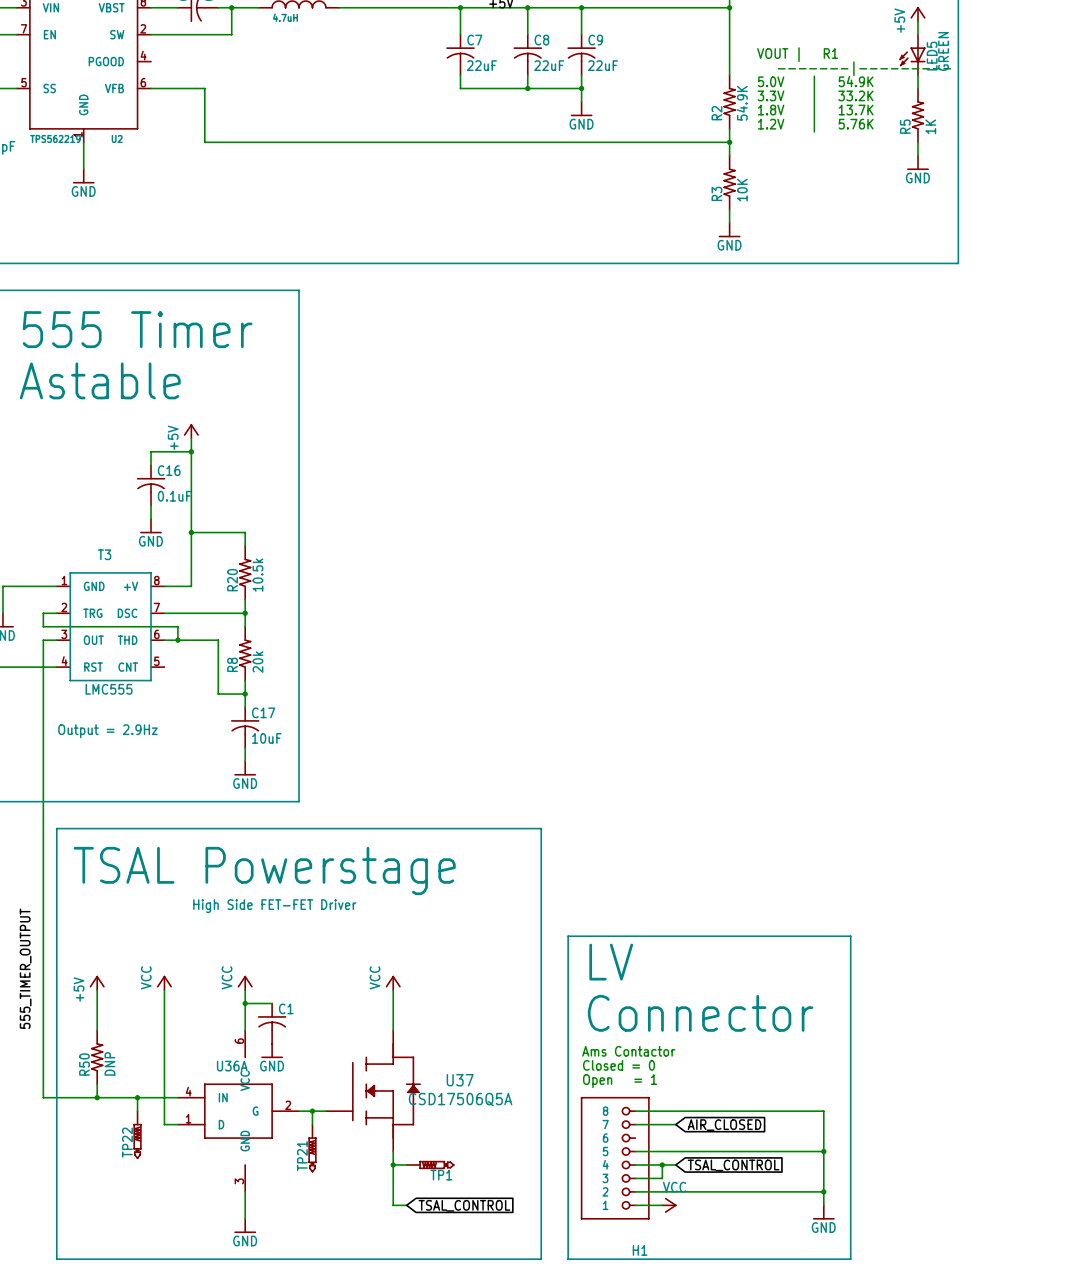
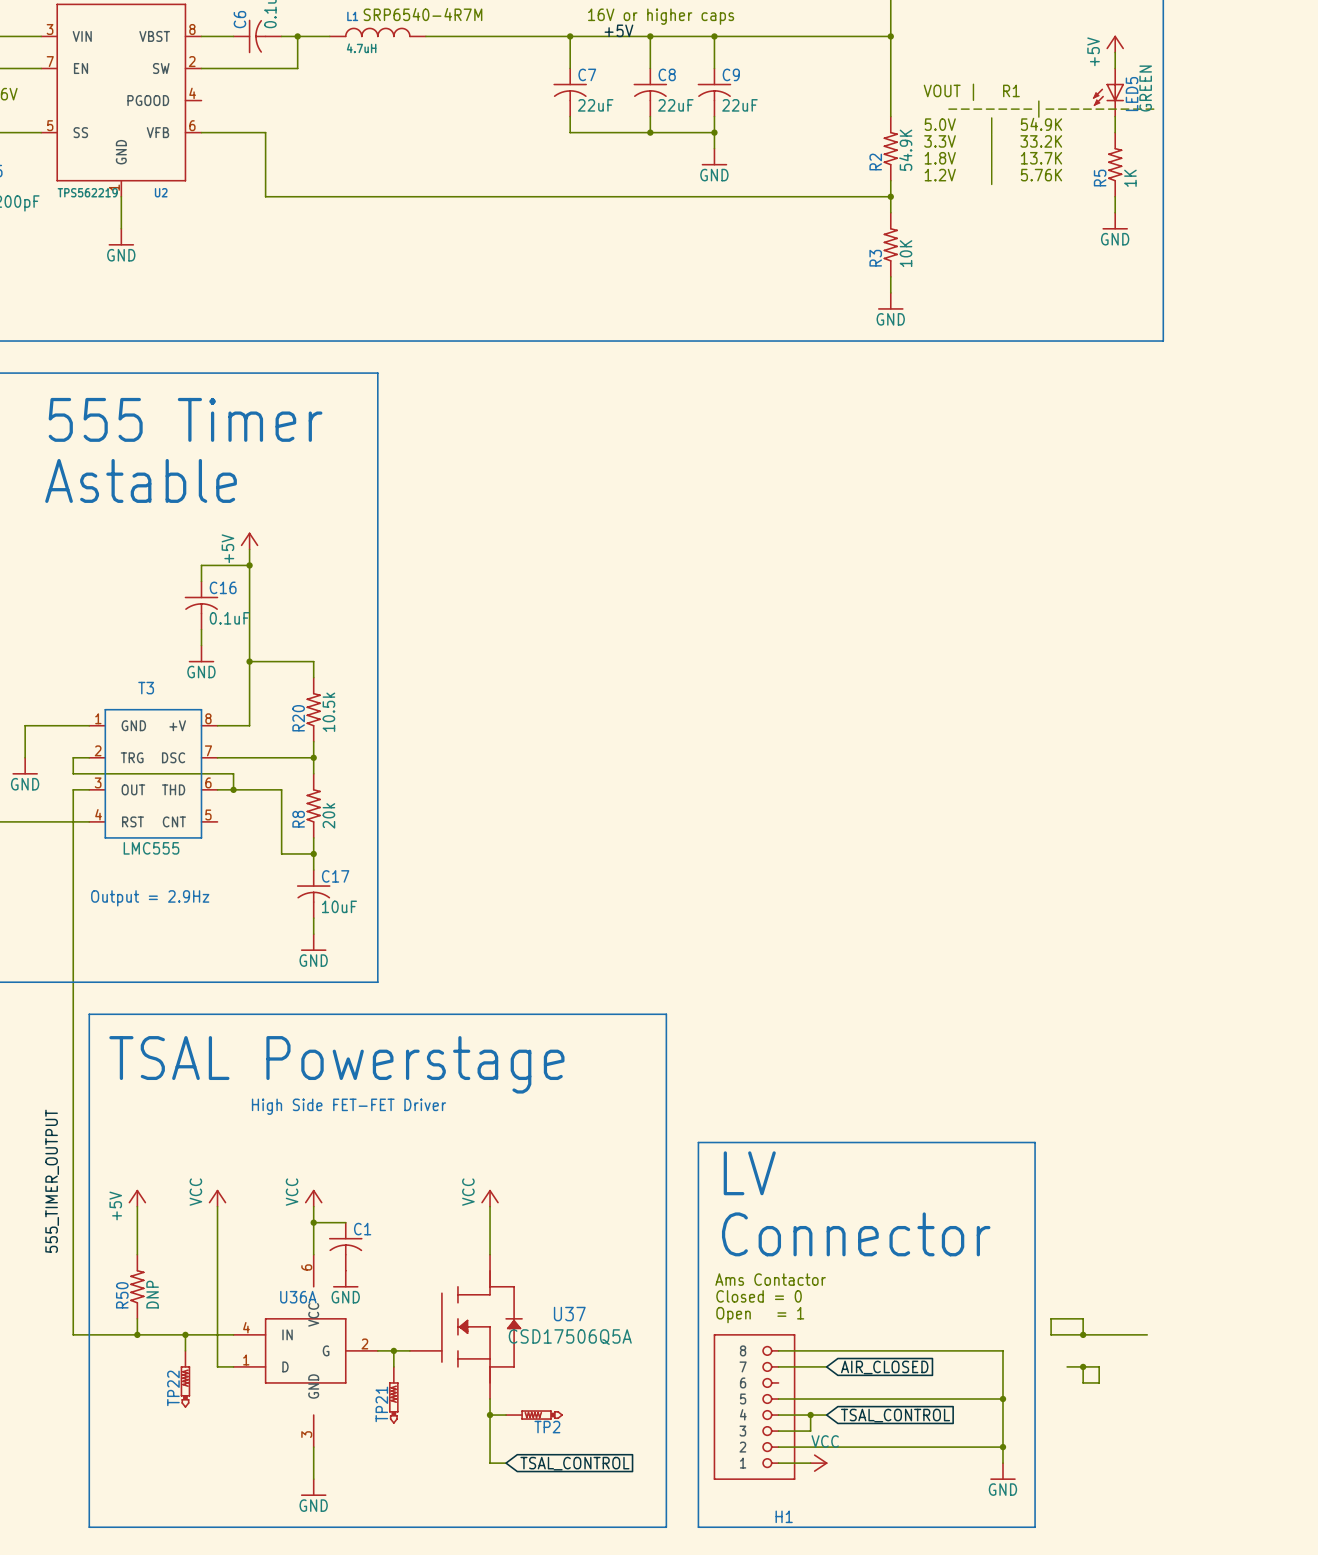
wire: none -> (1083, 1334) (1083, 1318) (1051, 1318) (1051, 1334) (1147, 1334)
junction: none -> (1083, 1334)
wire: none -> (1067, 1366) (1099, 1366) (1099, 1382) (1083, 1382) (1083, 1366)
junction: none -> (1083, 1366)
TP1 name: TP1 (441, 1175) -> TP2 (547, 1427)

